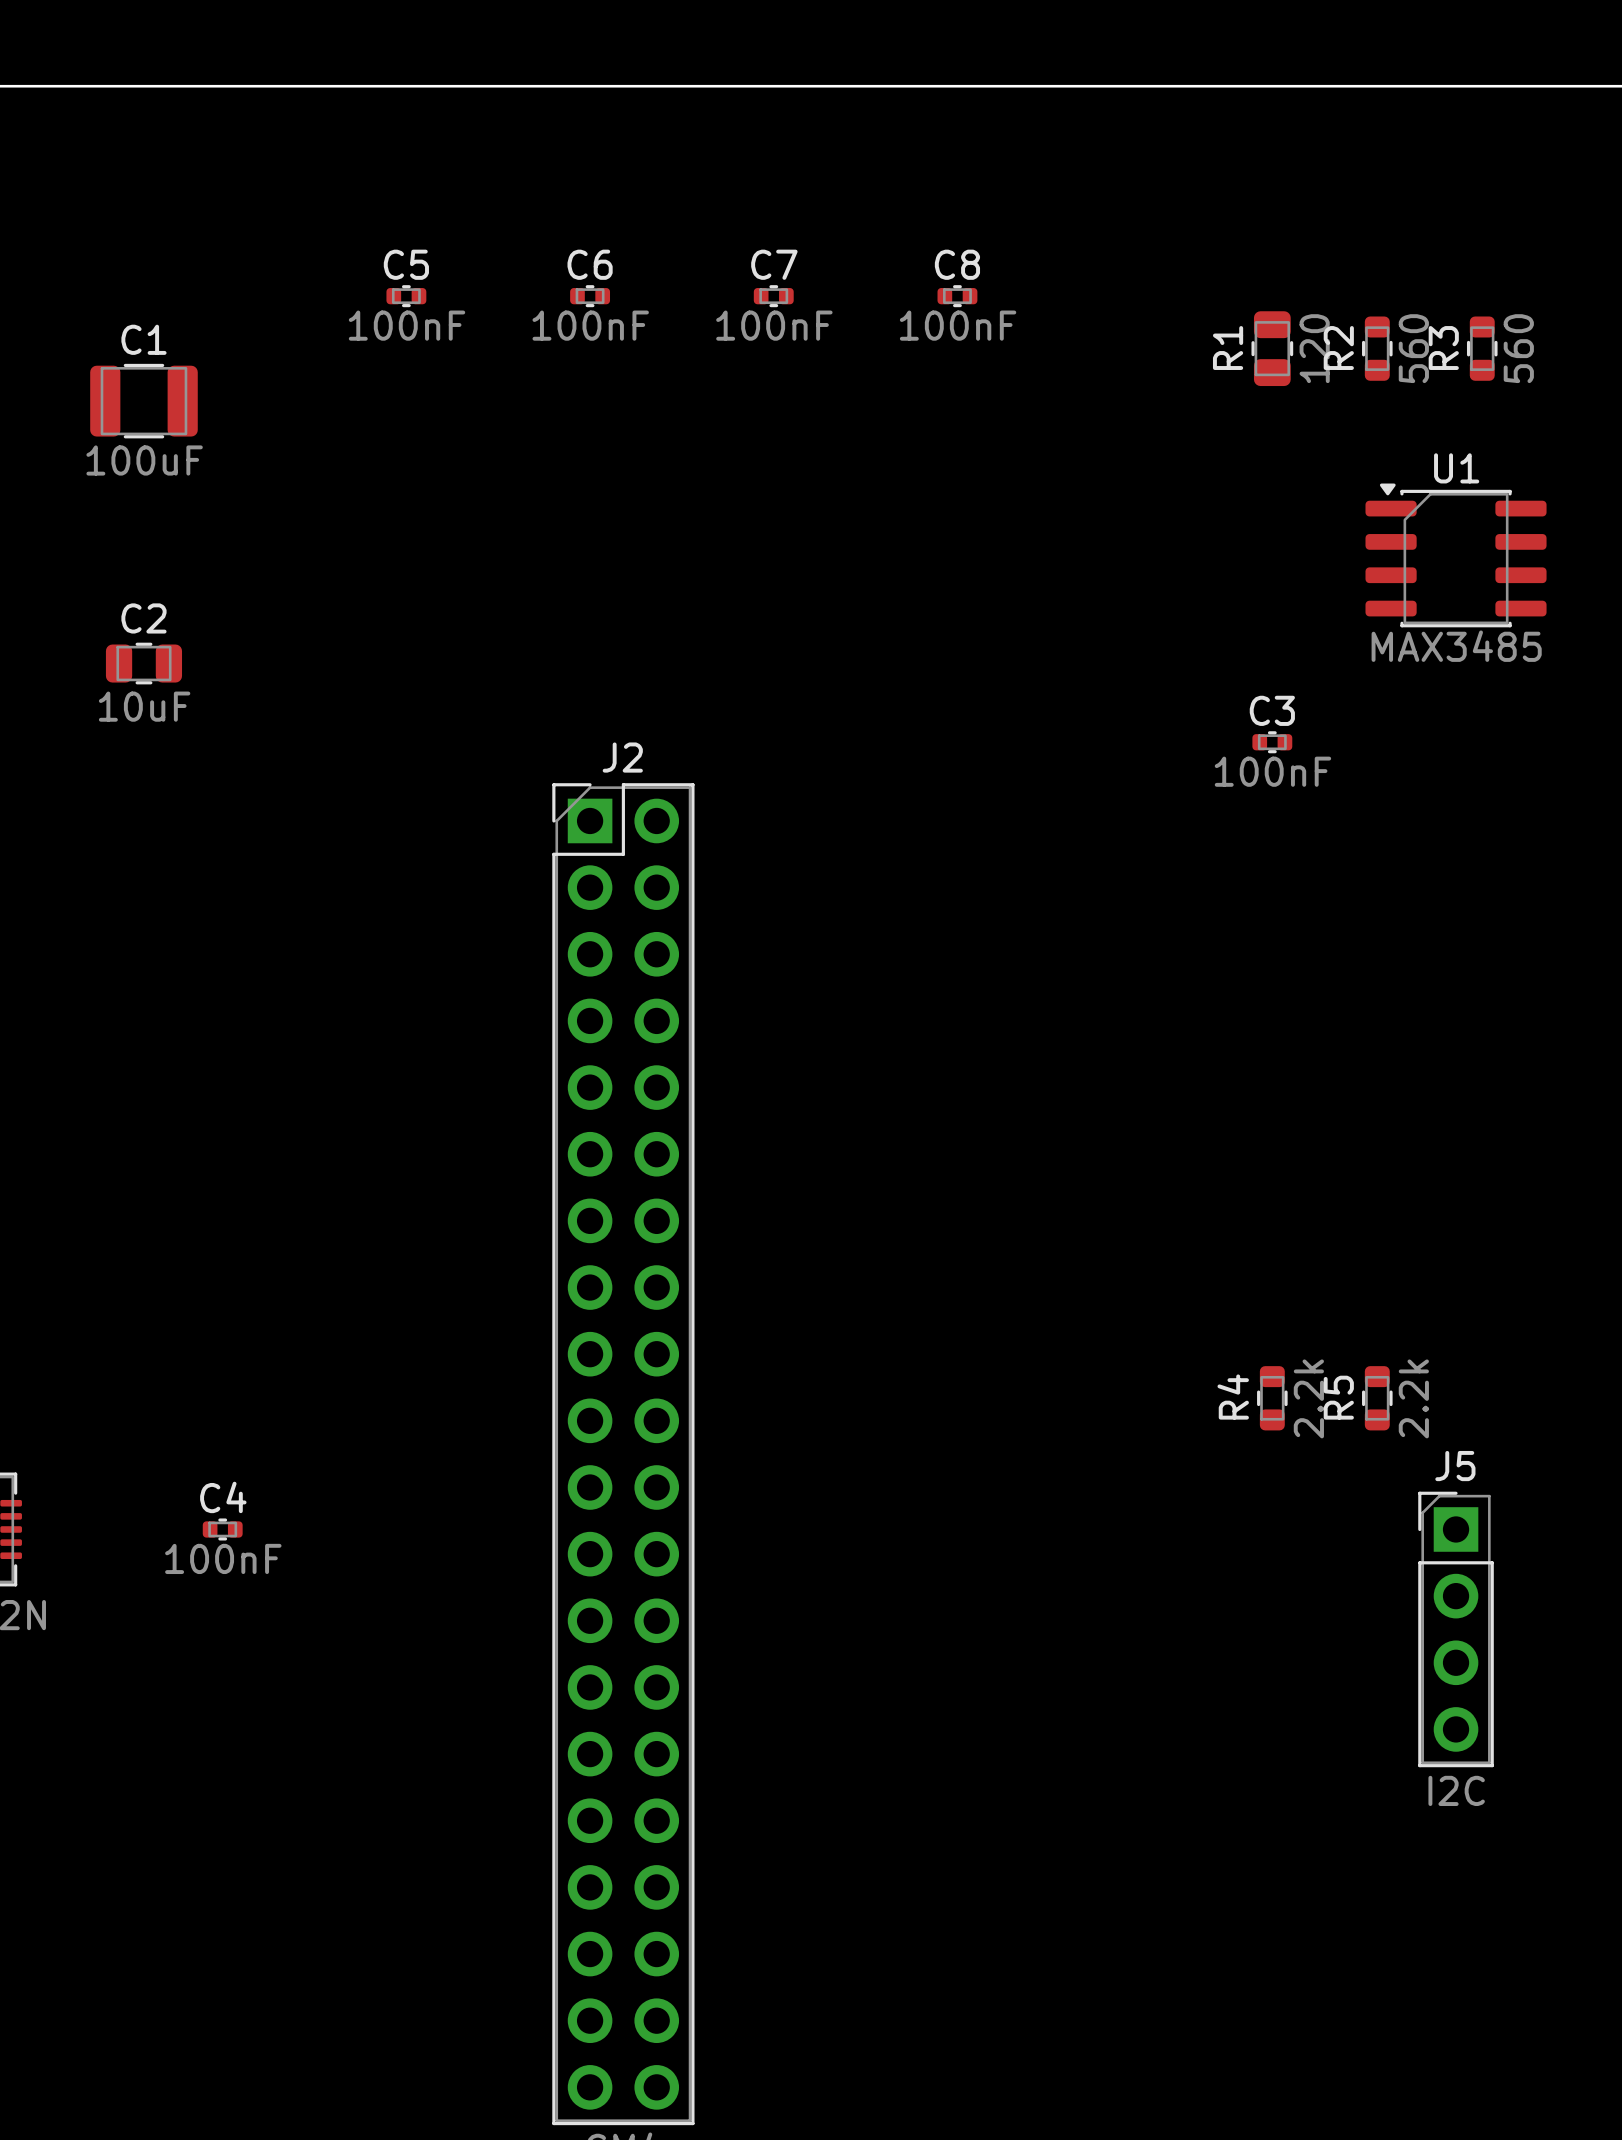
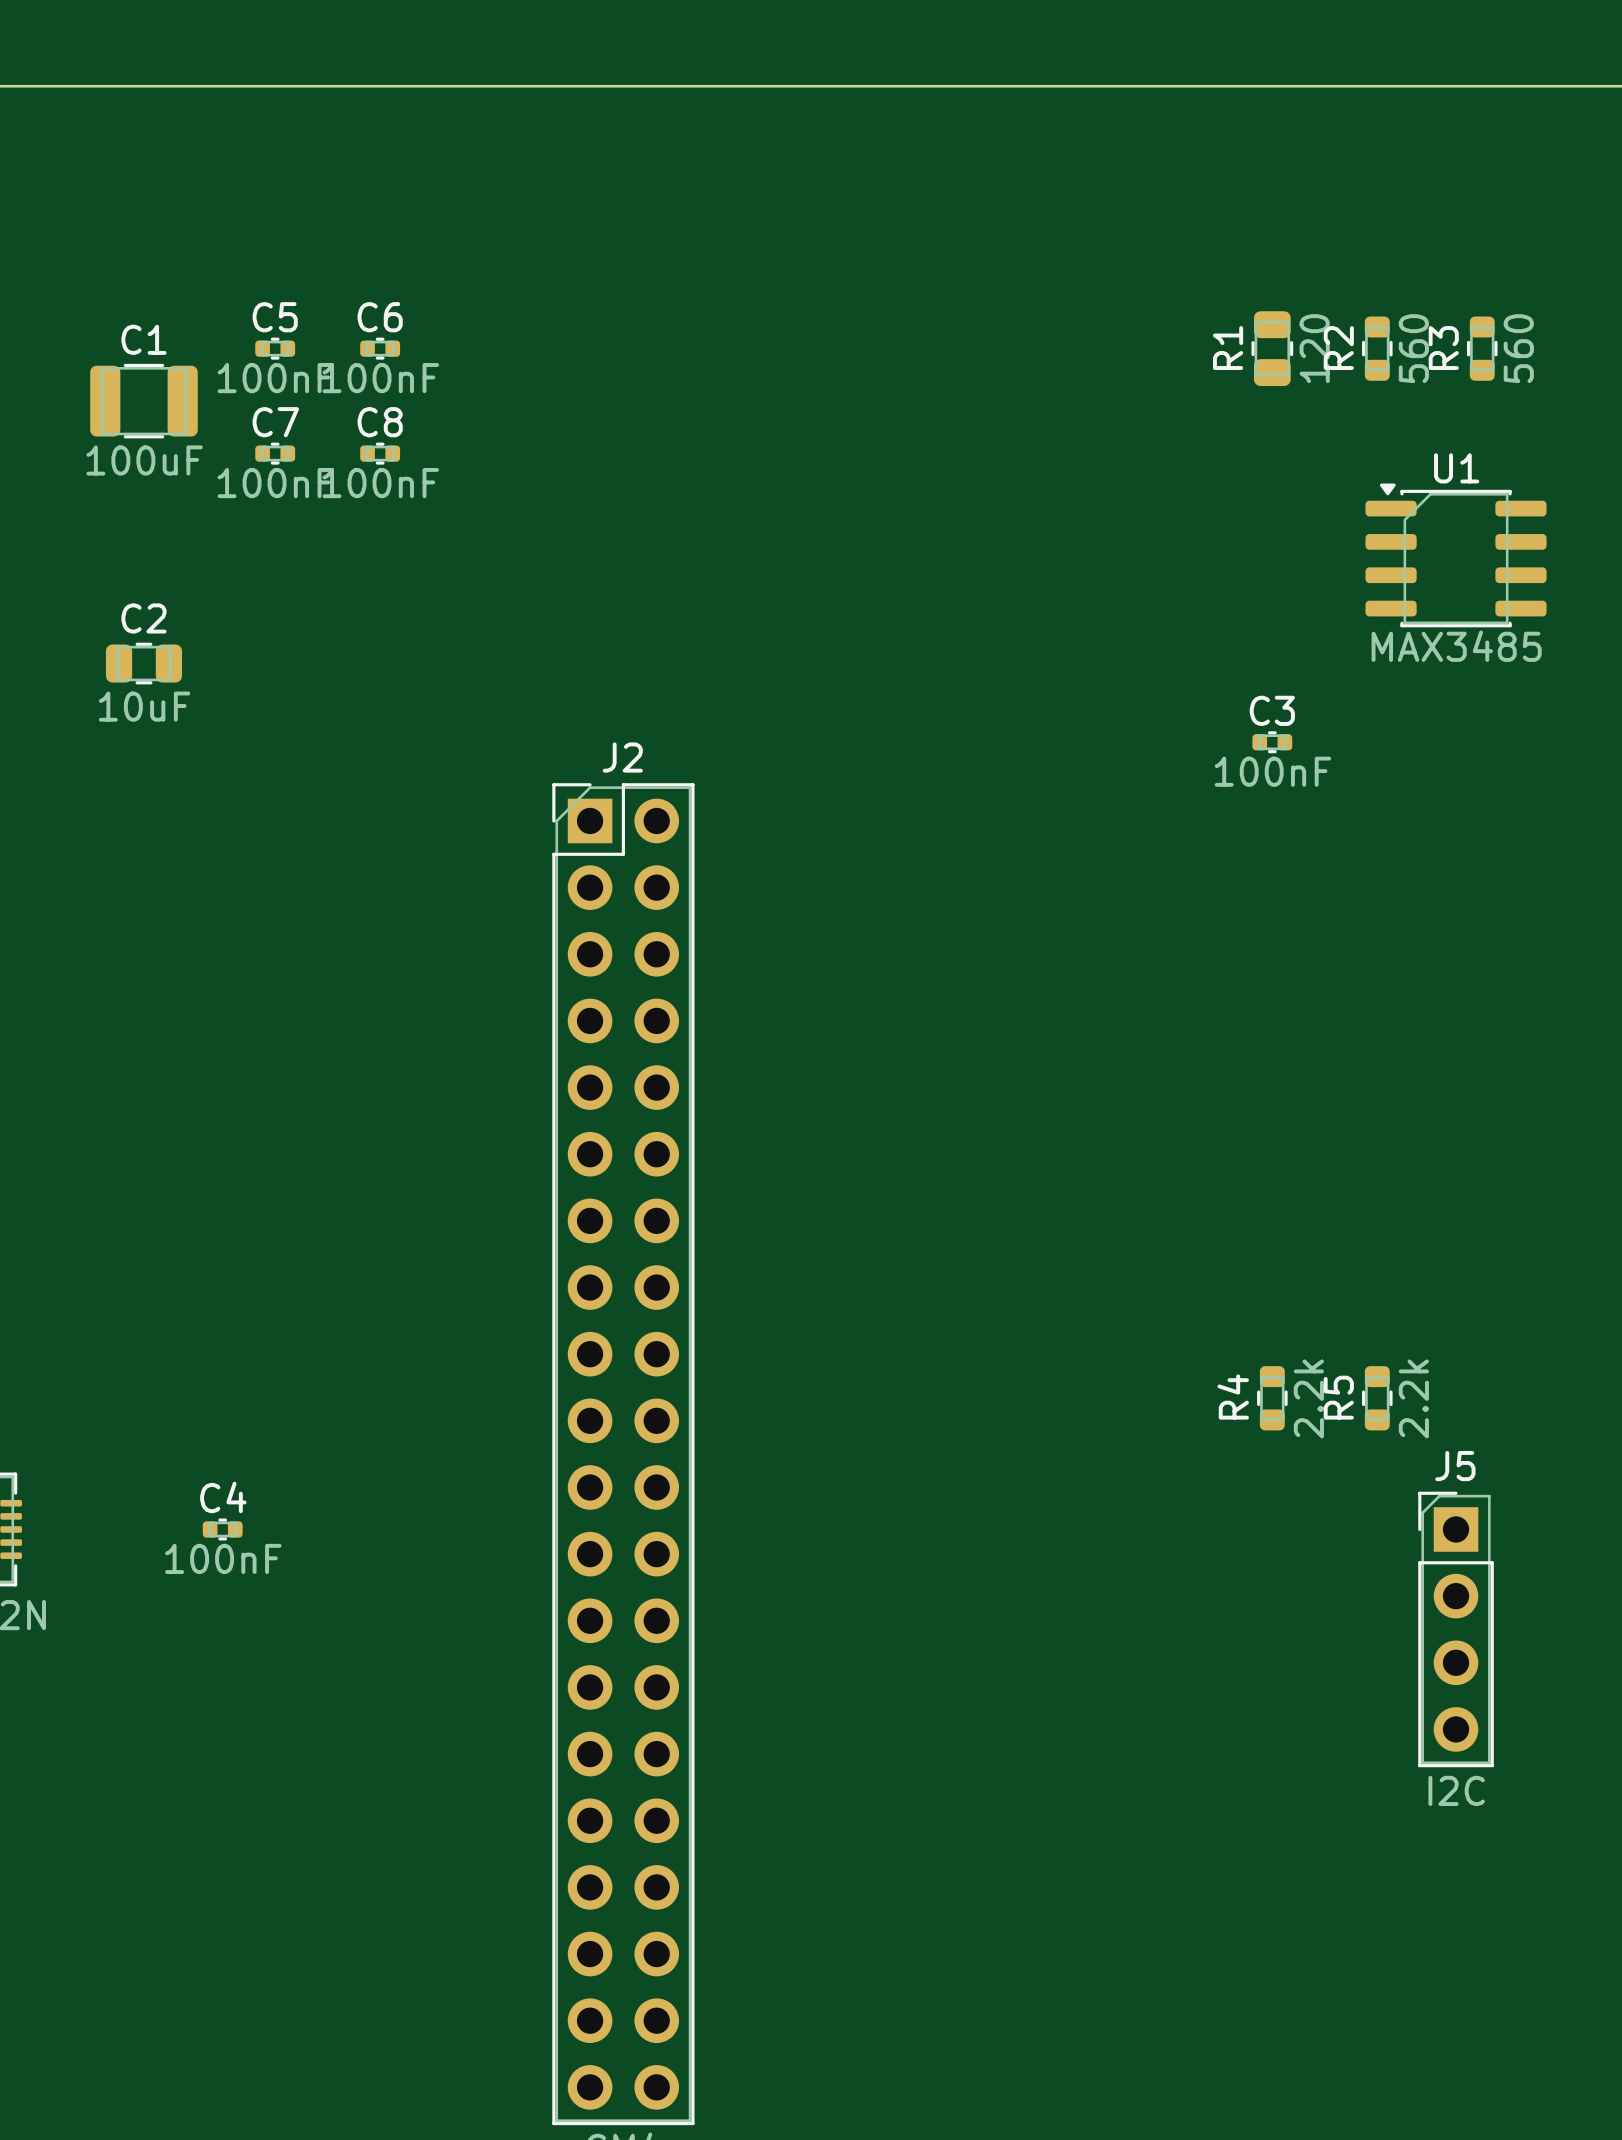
C5 position: (406, 296) -> (275, 348)
C6 position: (590, 296) -> (380, 348)
C7 position: (773, 296) -> (275, 453)
C8 position: (957, 296) -> (380, 453)

